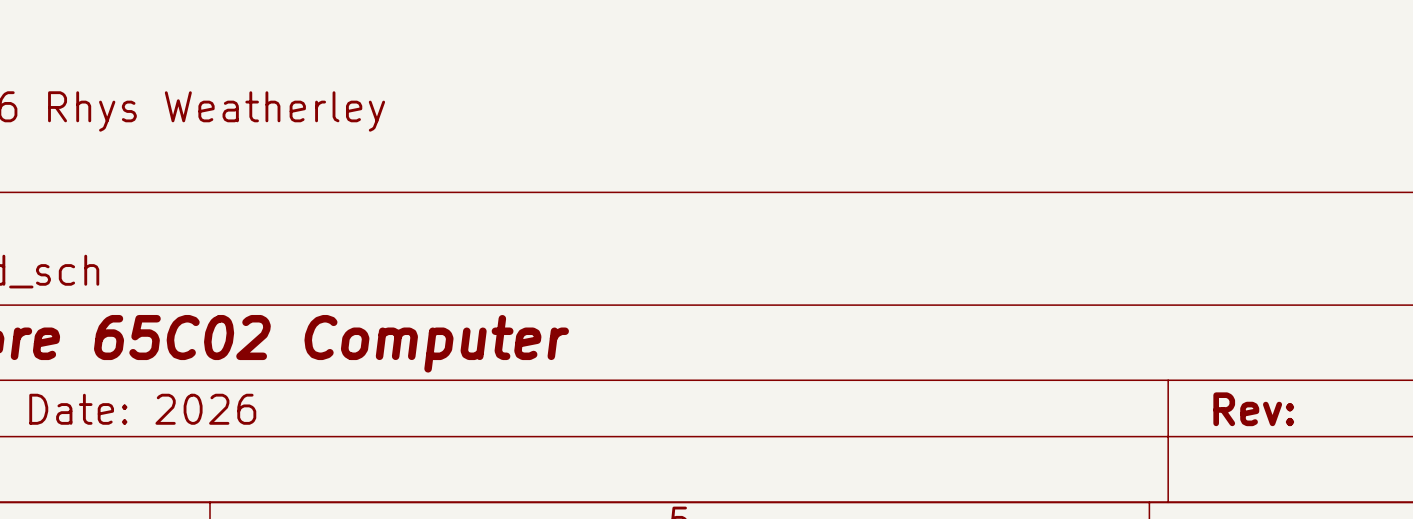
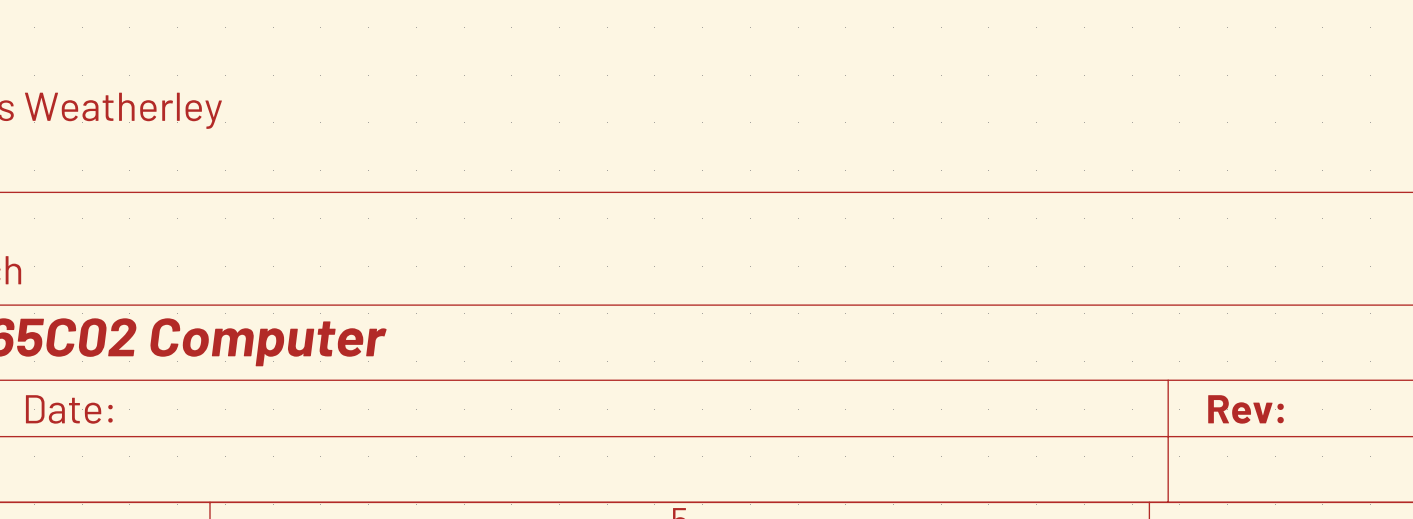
title block: Date: 2026 (142, 409) -> Date: (69, 409)

